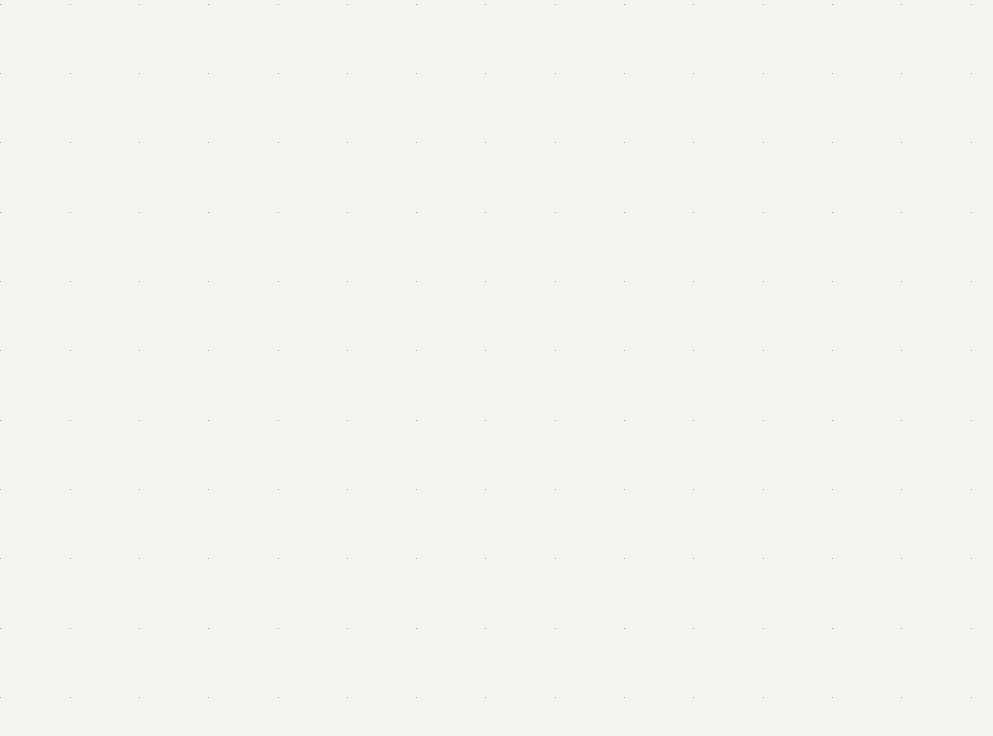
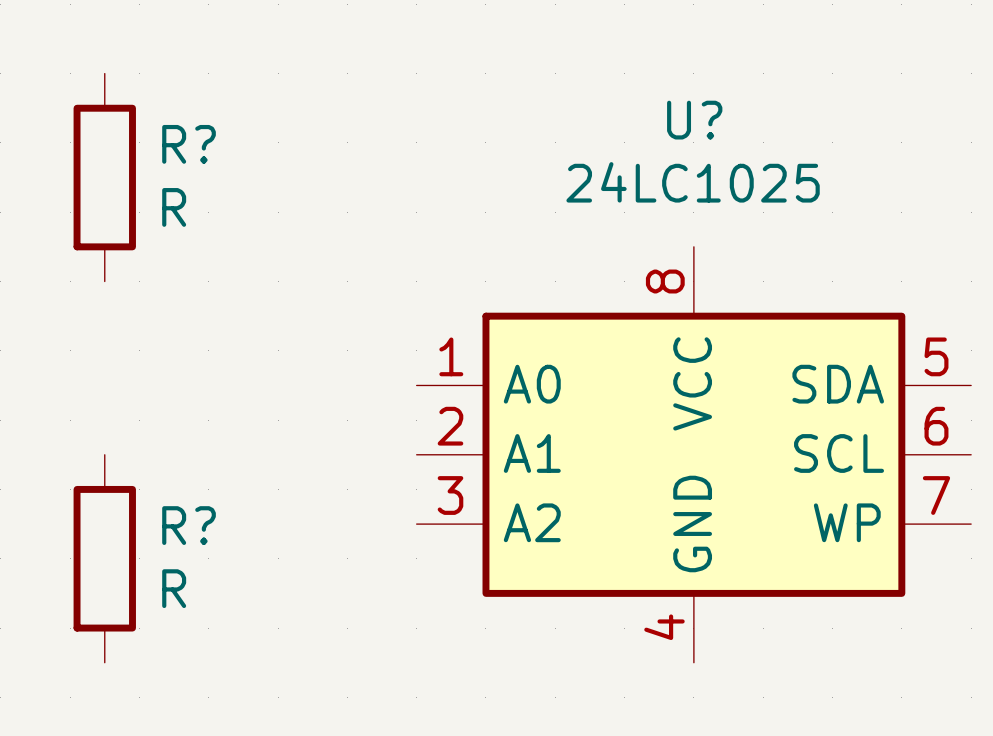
R?: none -> R (104, 177)
U?: none -> 24LC1025 (693, 454)
R?: none -> R (104, 558)

